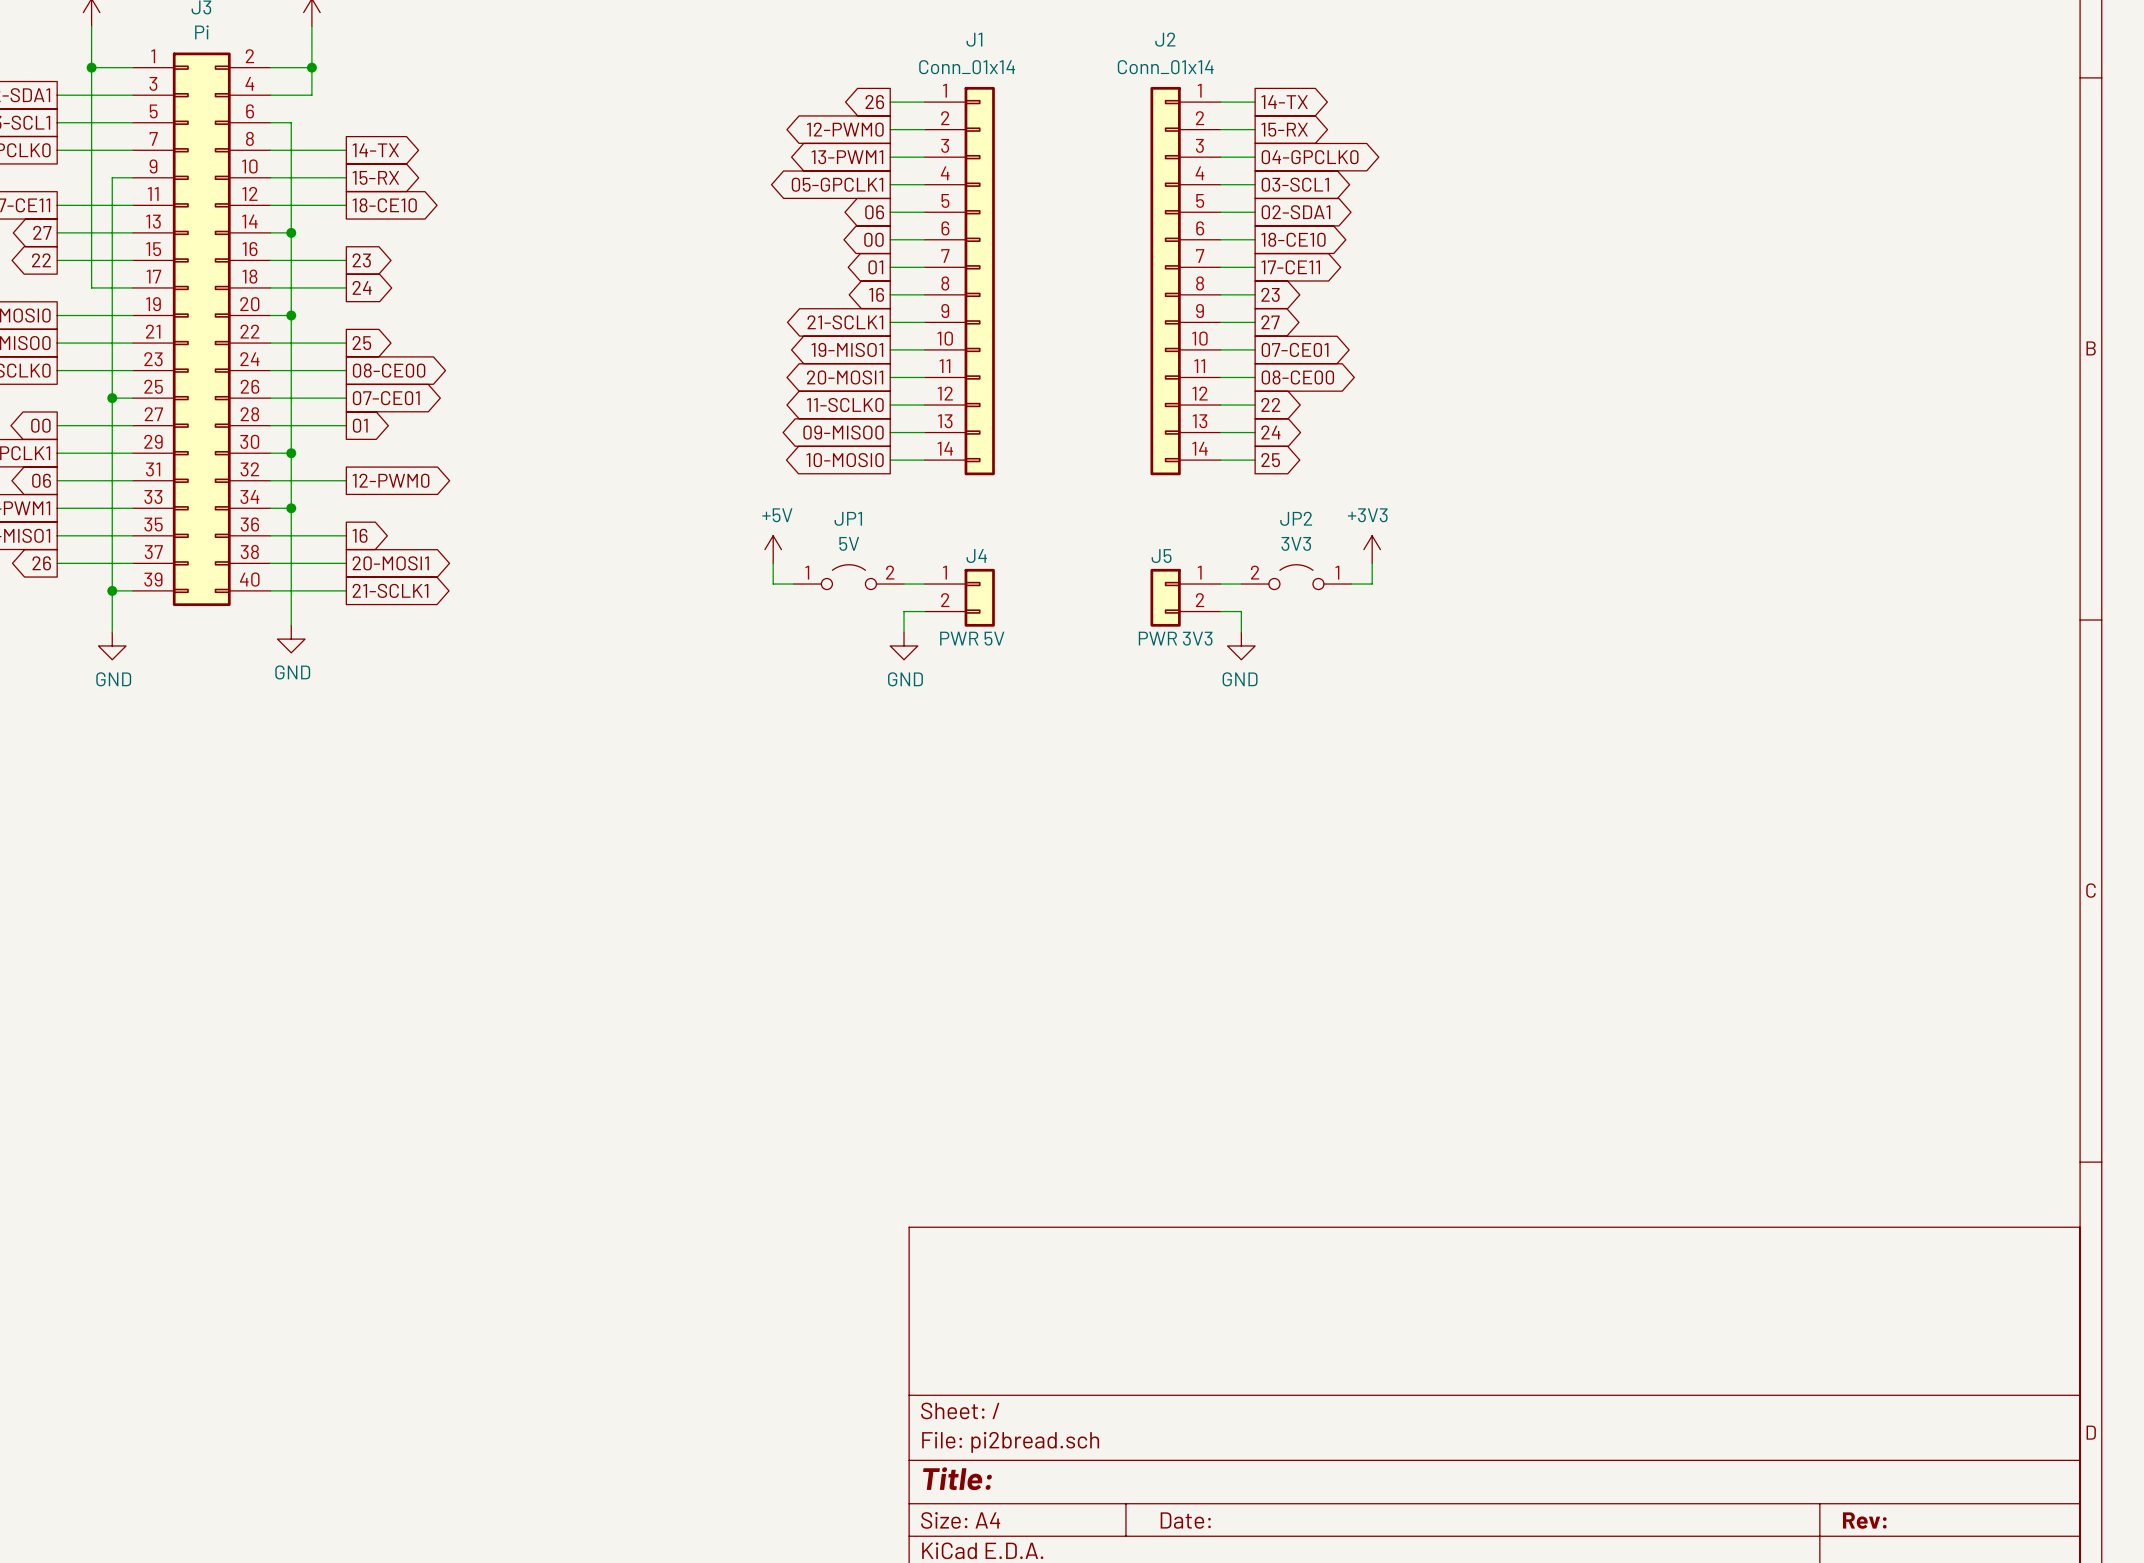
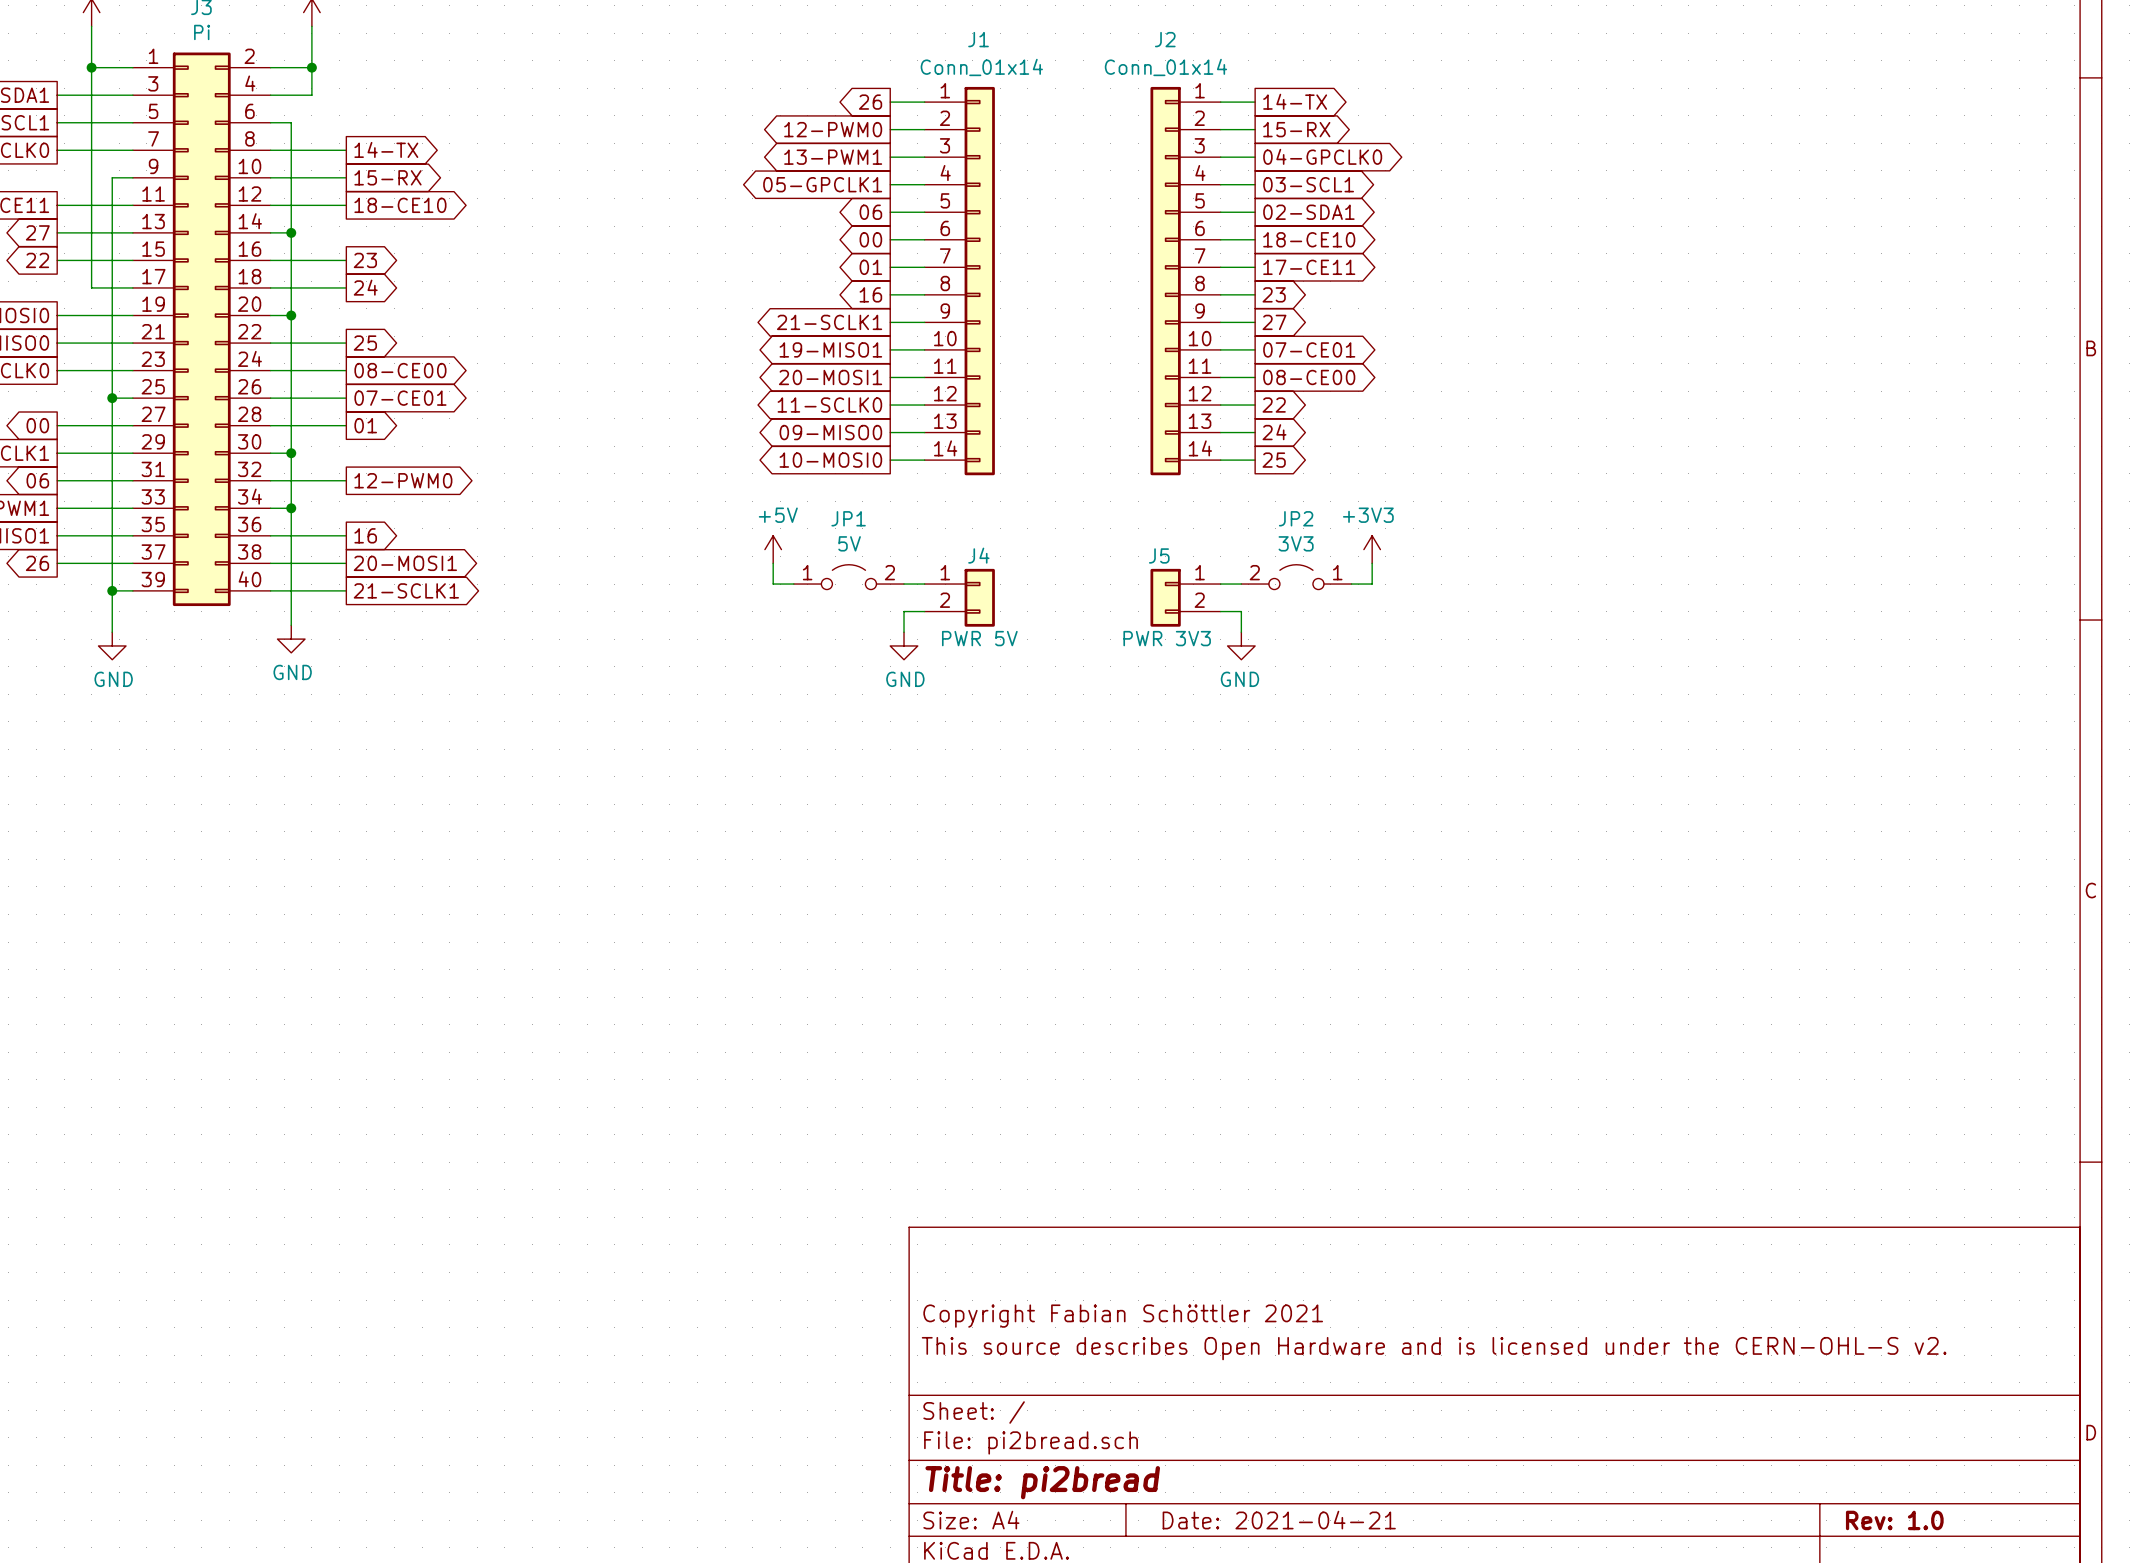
title block: none -> Copyright Fabian Schöttler 2021 (1123, 1316)
title block: none -> This source describes Open Hardware and is licensed under the CERN-OHL-S v2. (1434, 1348)
title block: Title: (957, 1478) -> Title: pi2bread (1042, 1482)
title block: Date: (1185, 1520) -> Date: 2021-04-21 (1279, 1520)
title block: Rev: (1864, 1520) -> Rev: 1.0 (1894, 1520)

